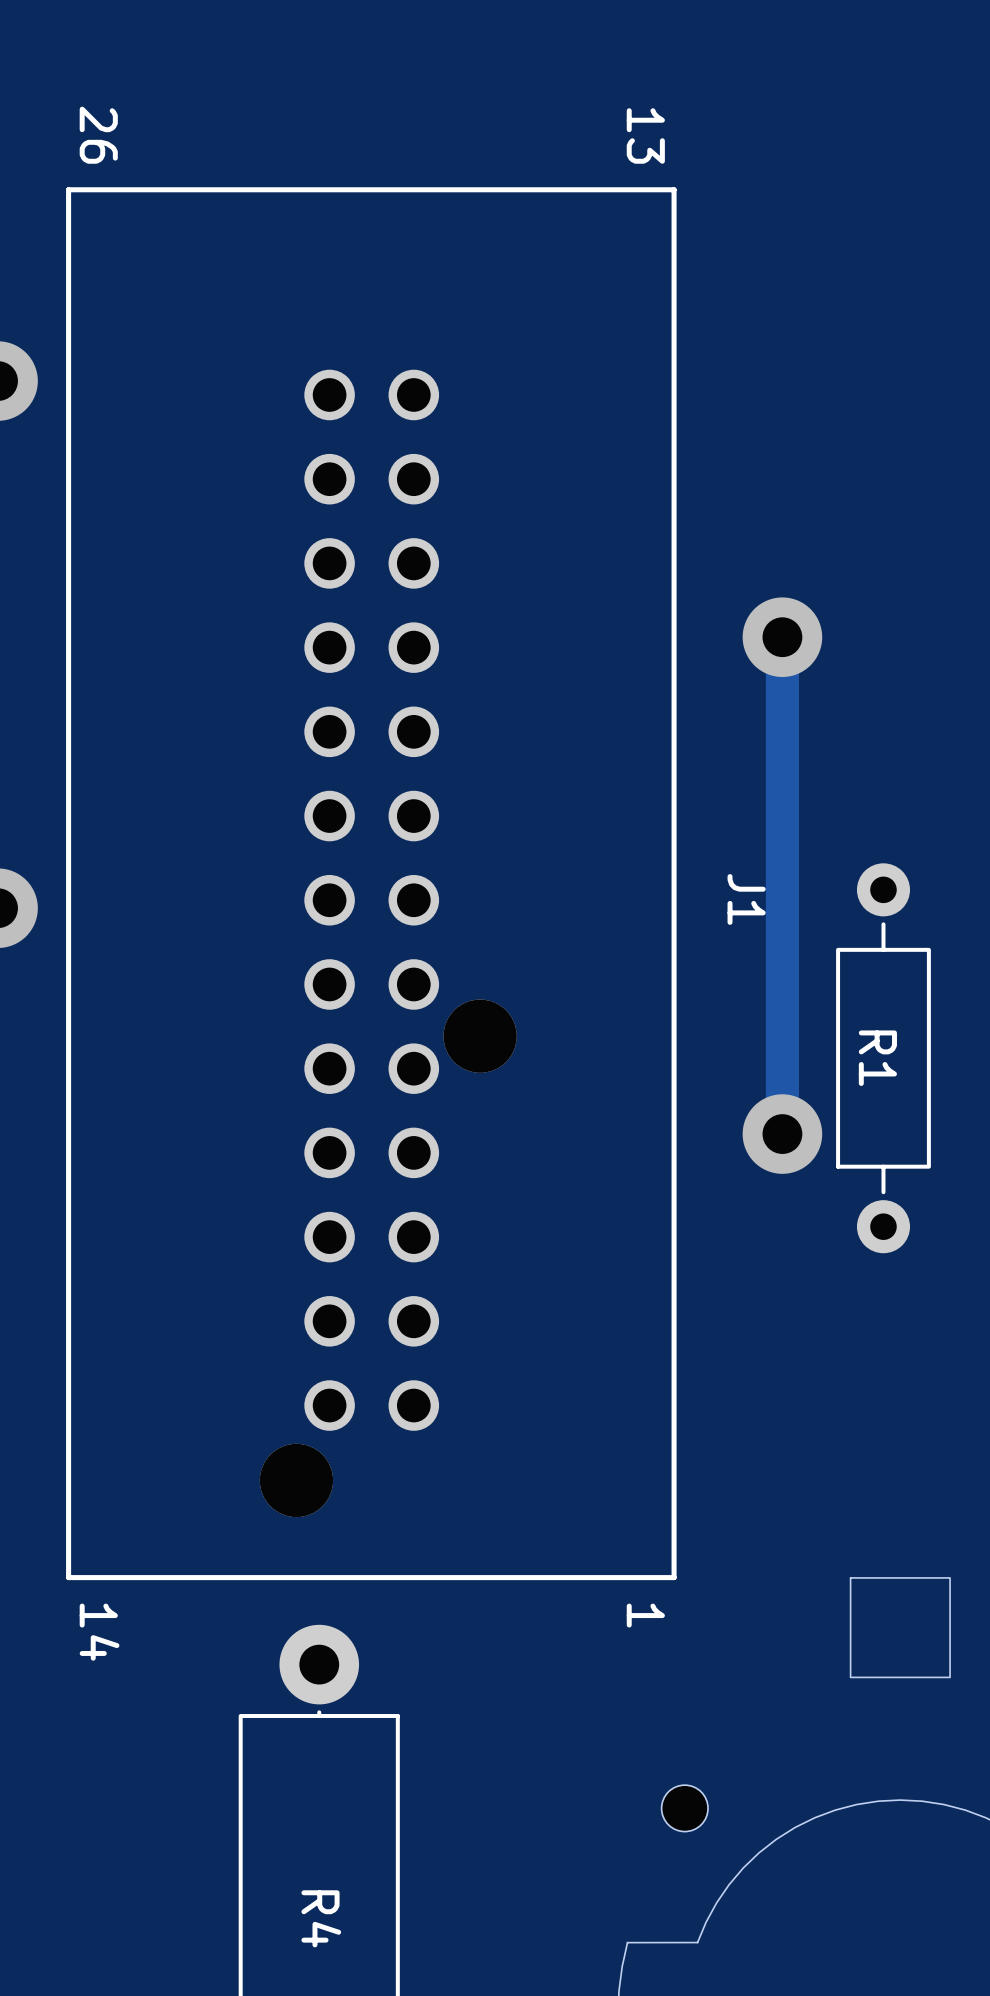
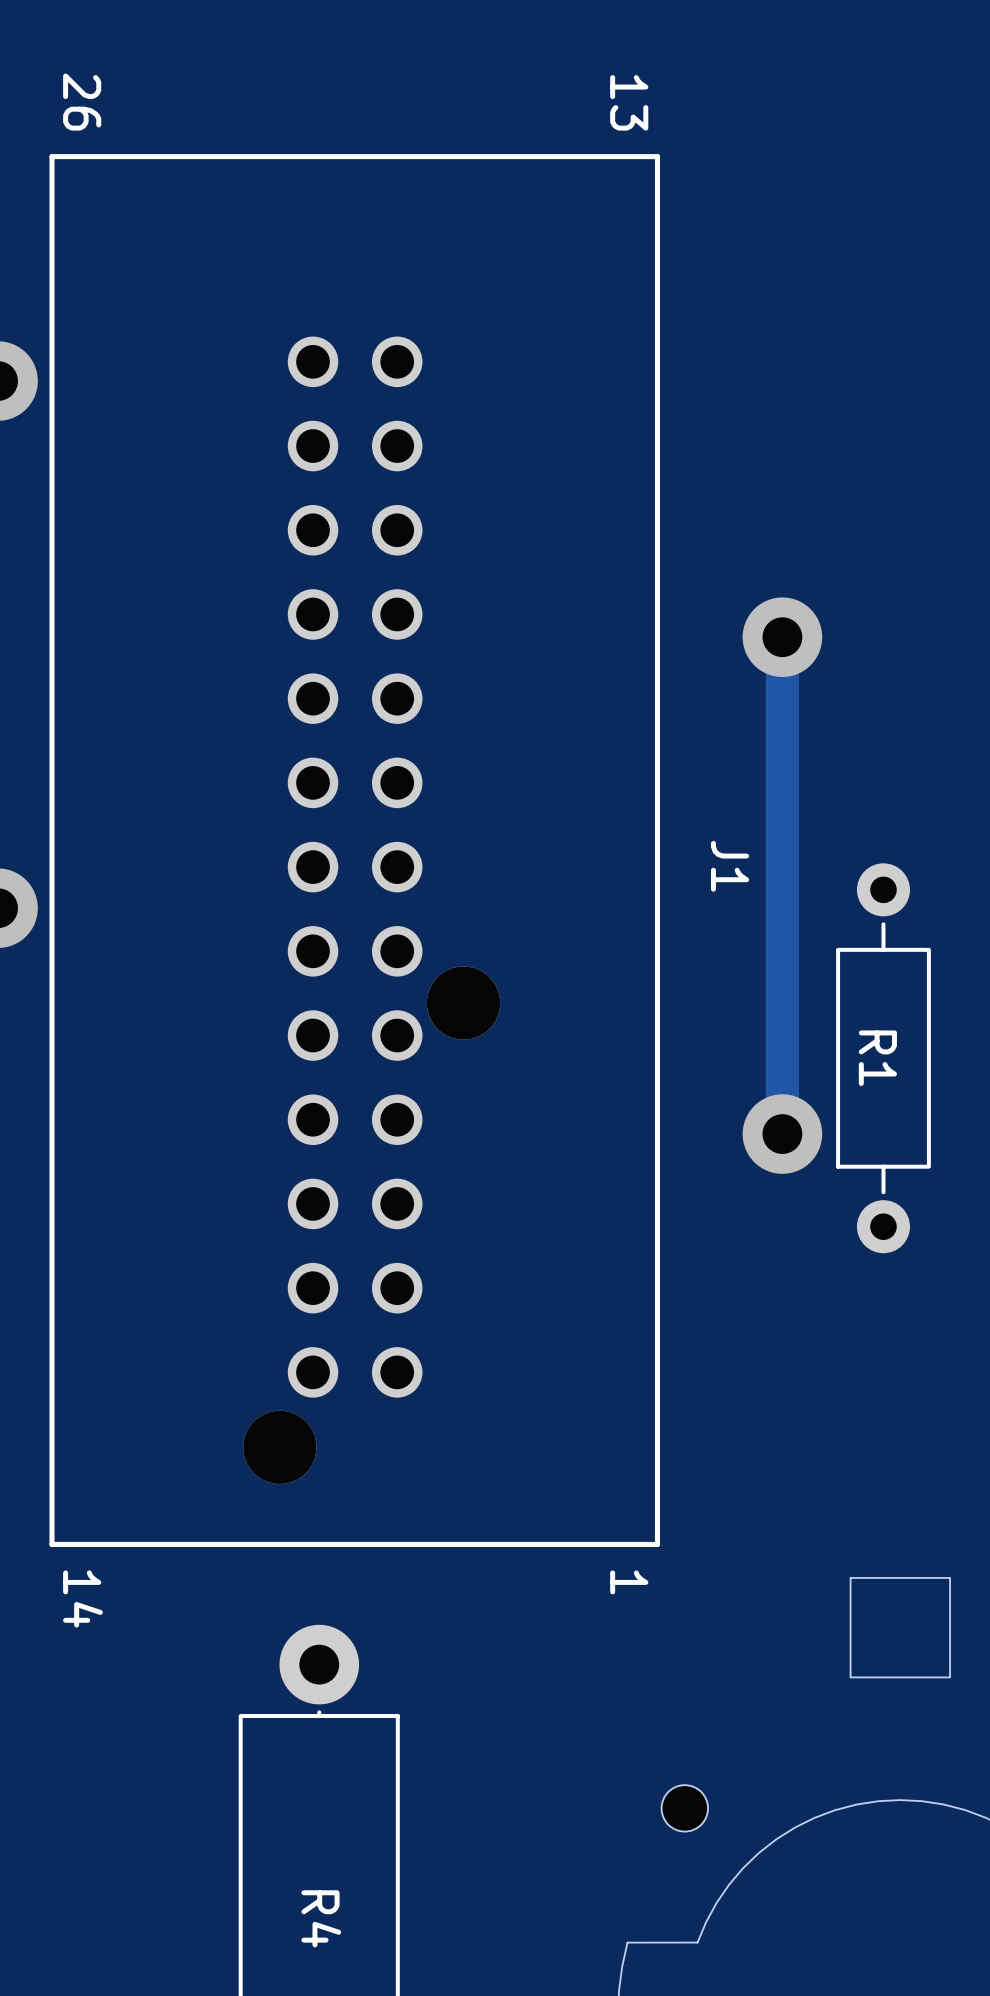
J1 position: (371, 883) -> (354, 850)

